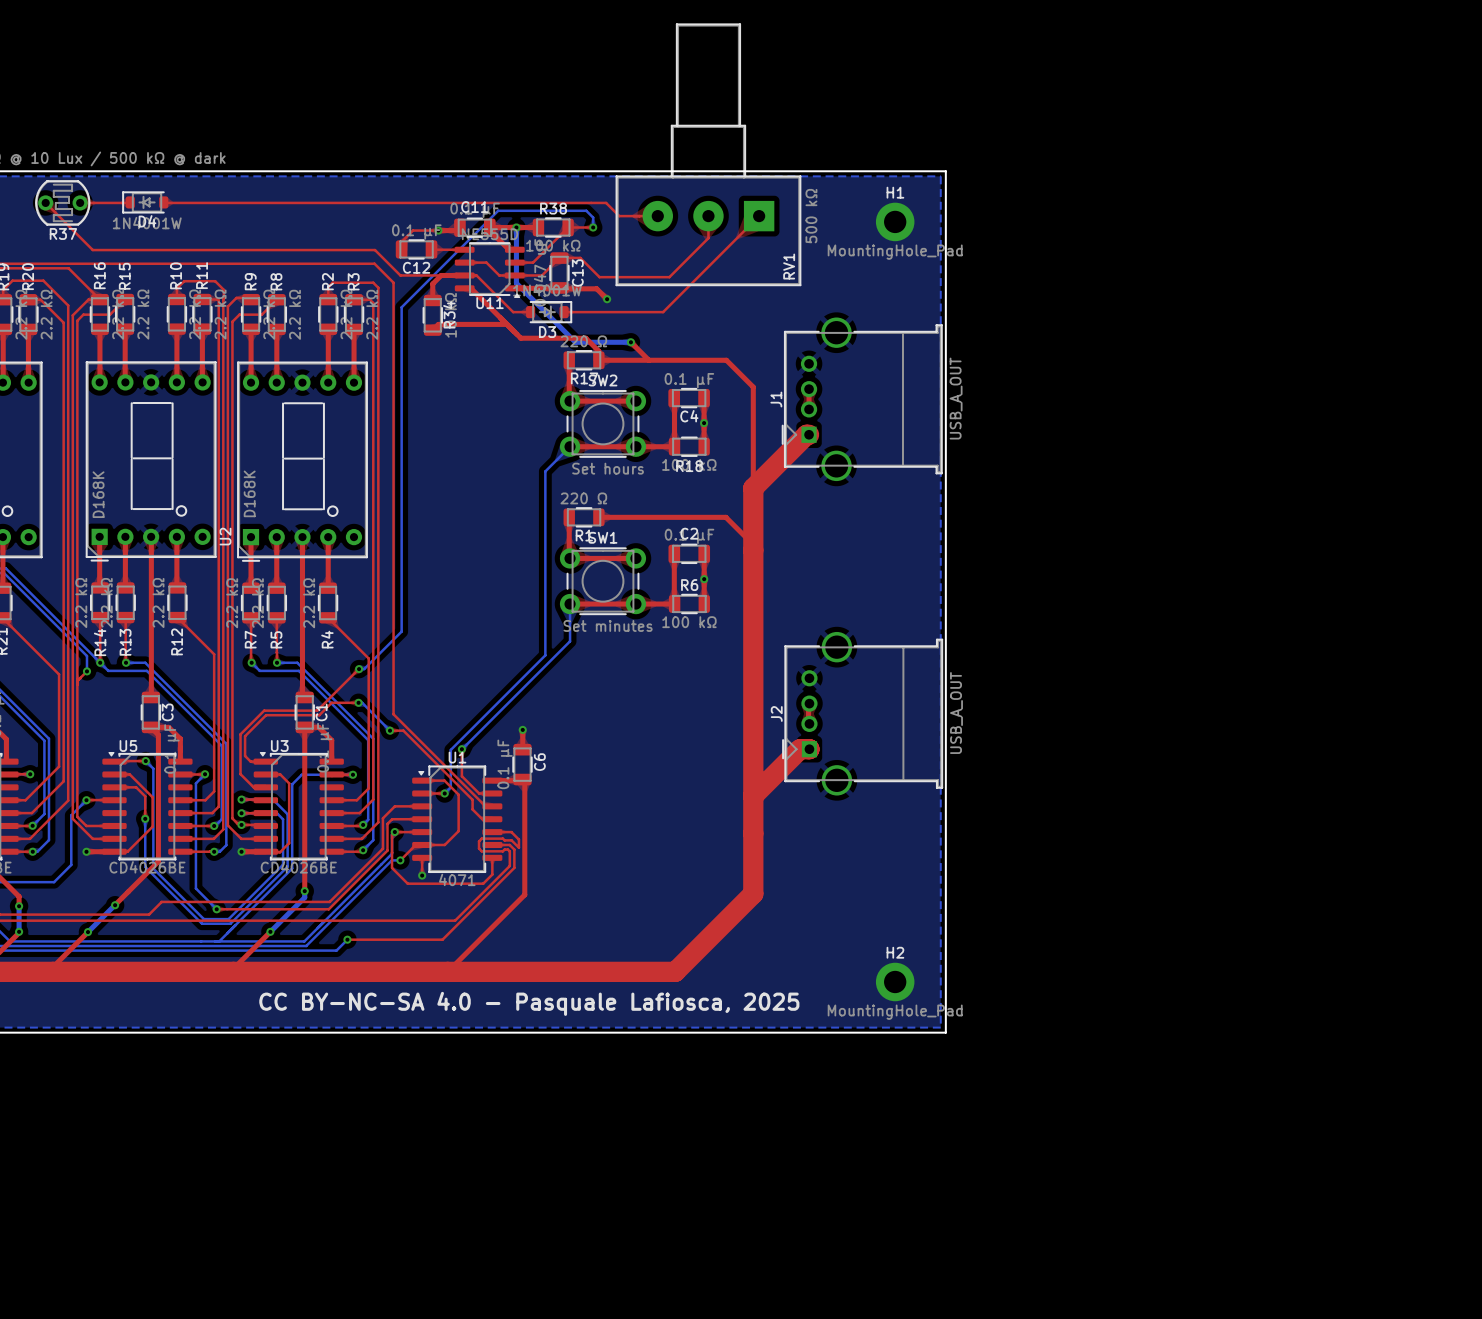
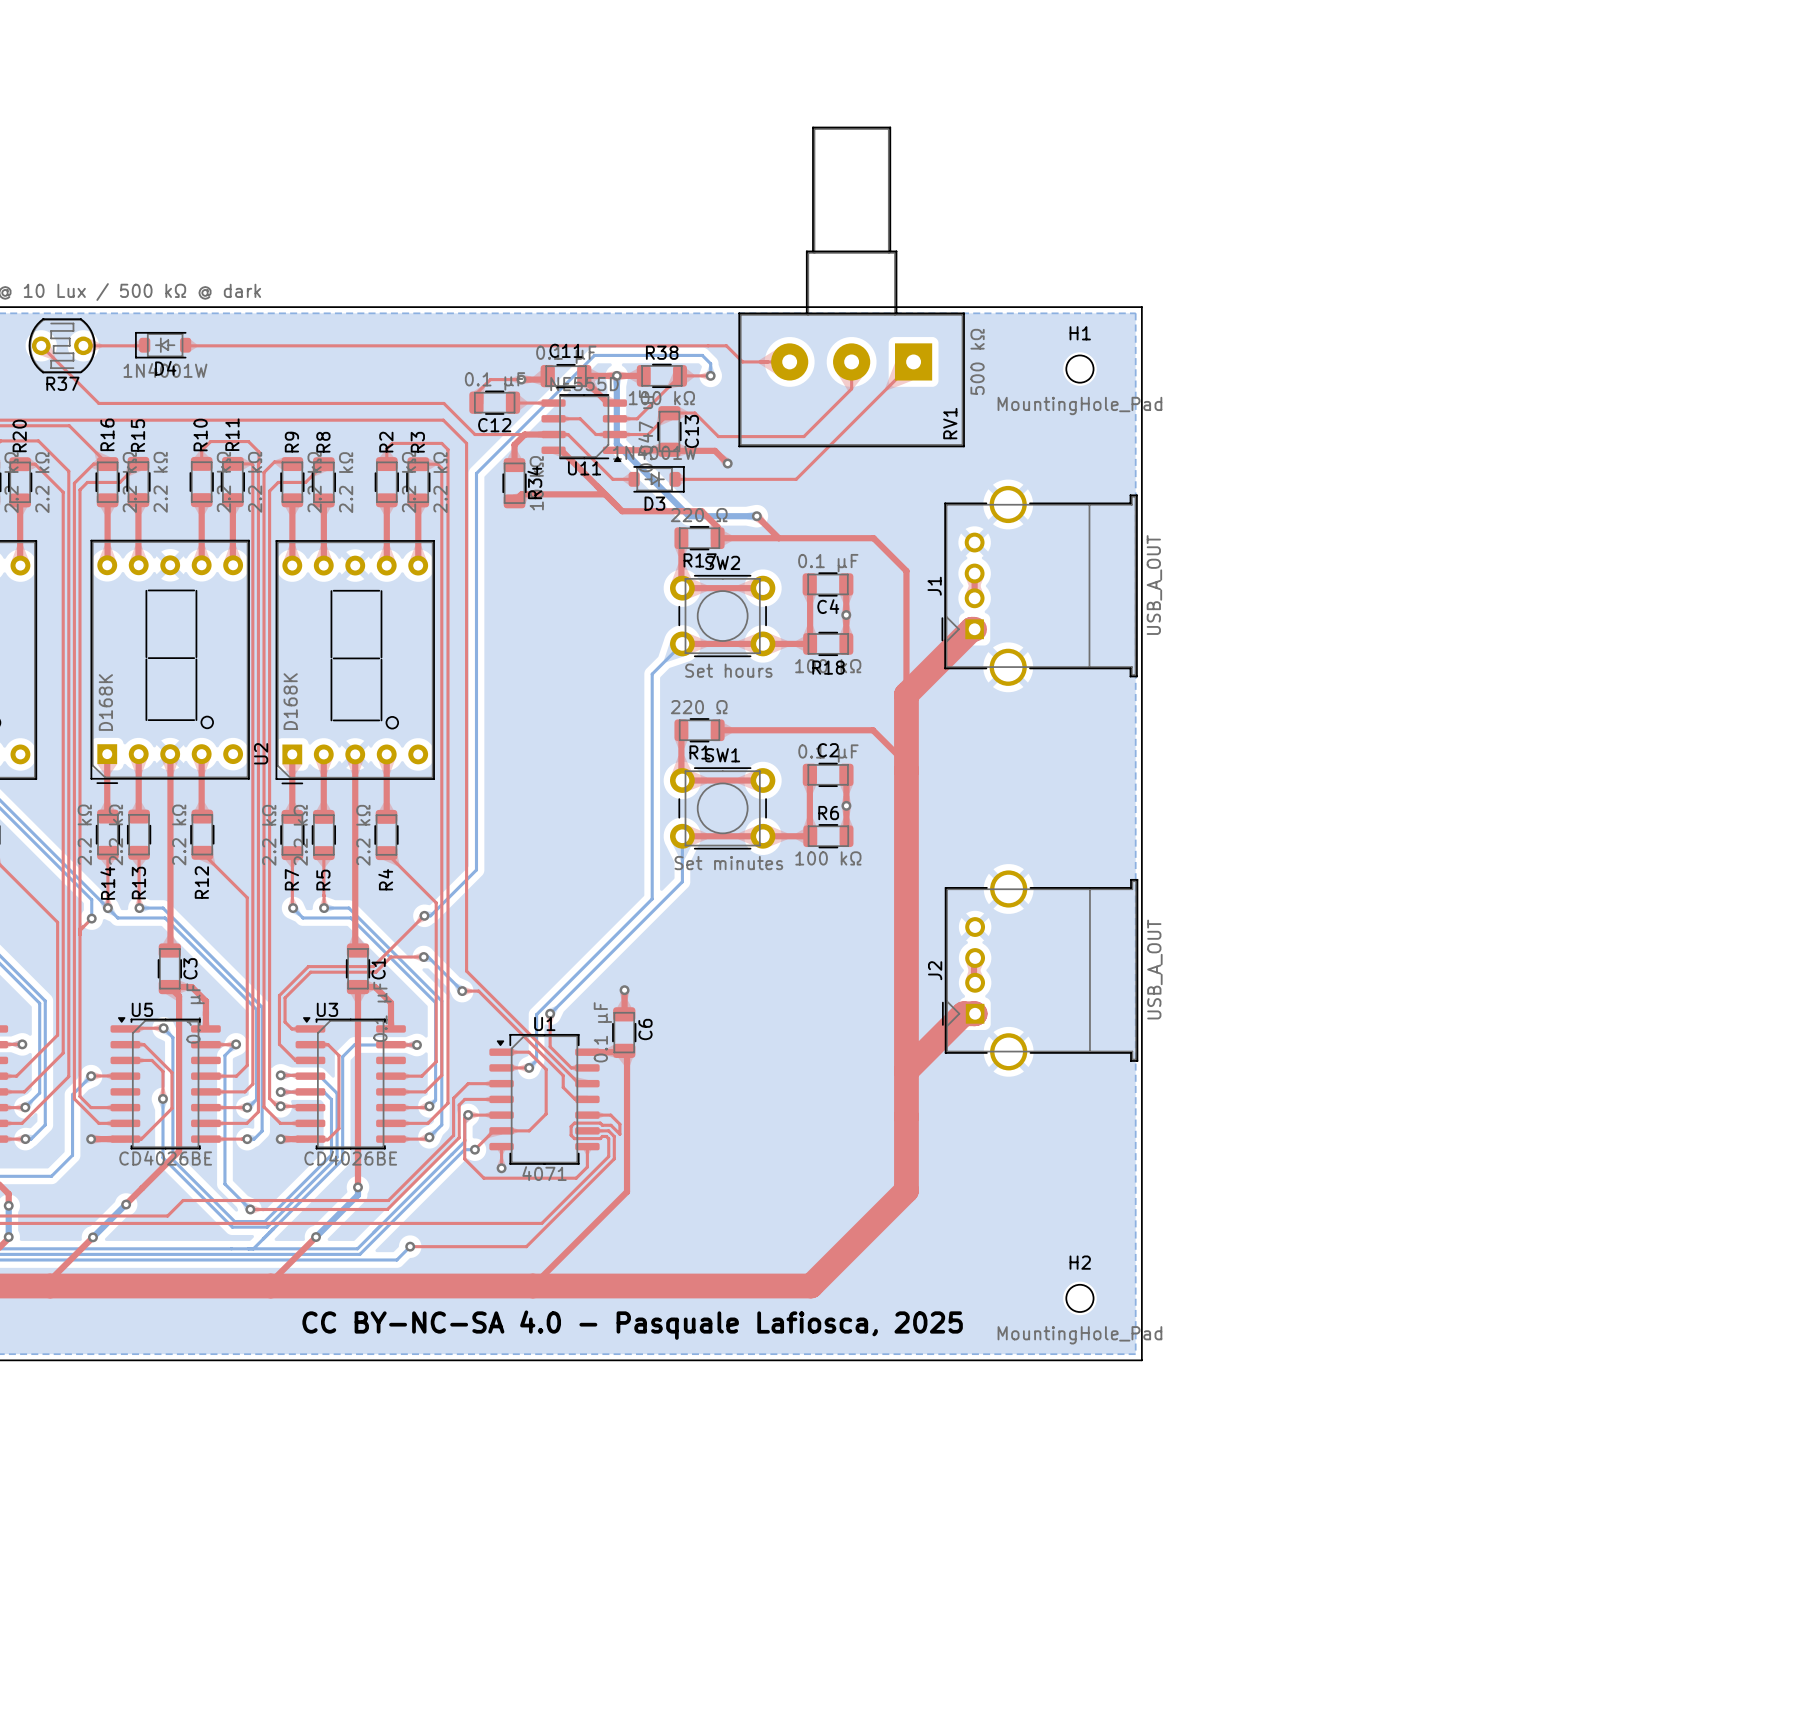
H1 footprint: [875, 202, 915, 242] -> [1066, 355, 1094, 383]
H2 footprint: [875, 962, 915, 1002] -> [1066, 1284, 1094, 1313]

